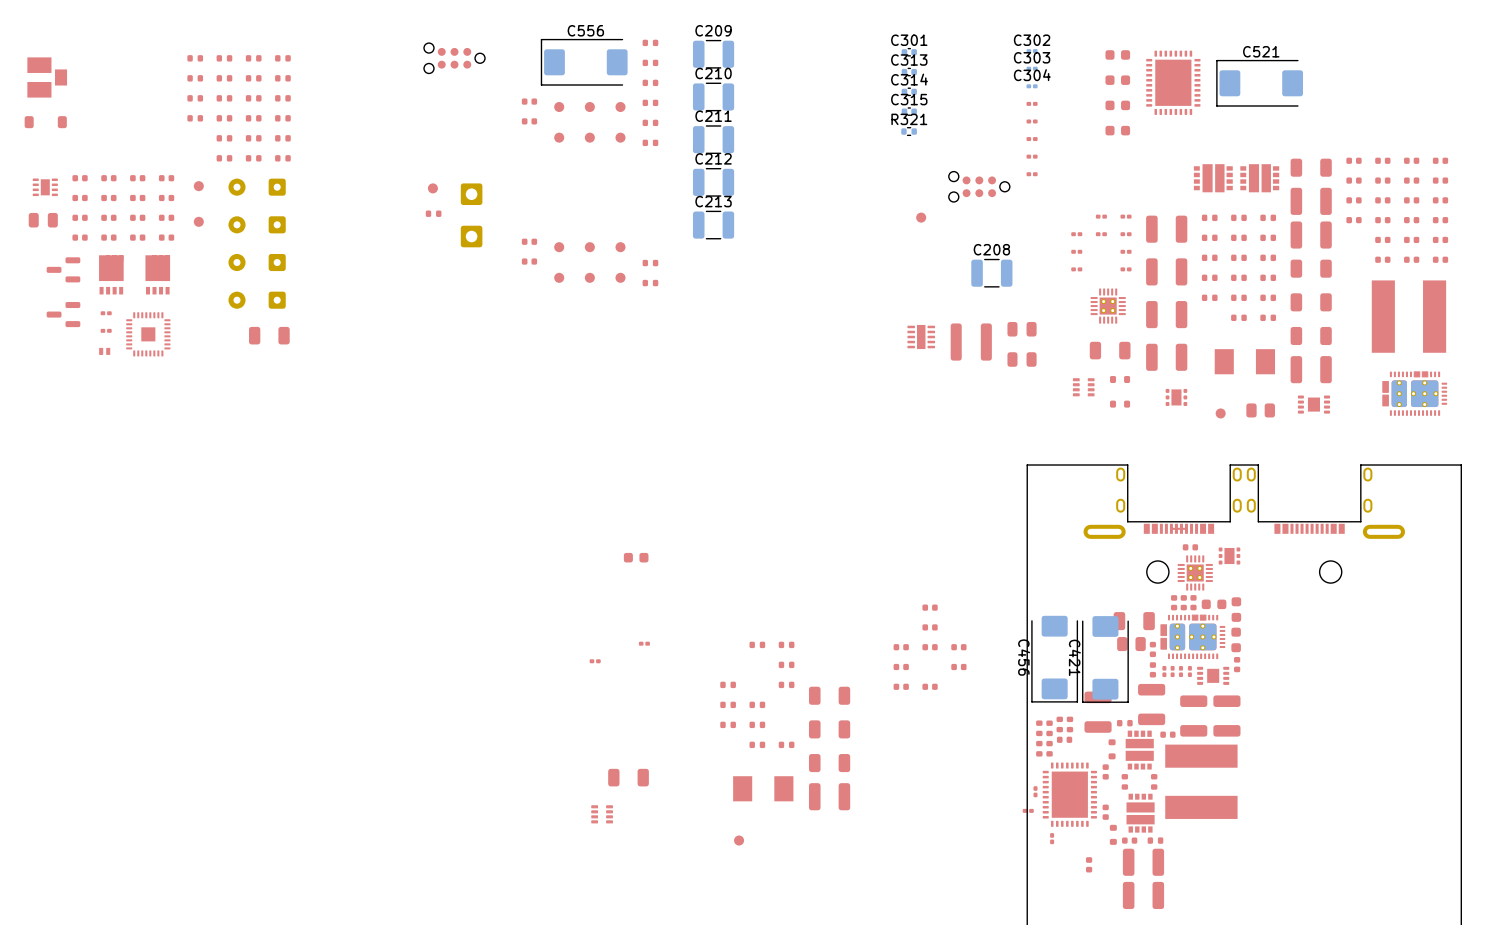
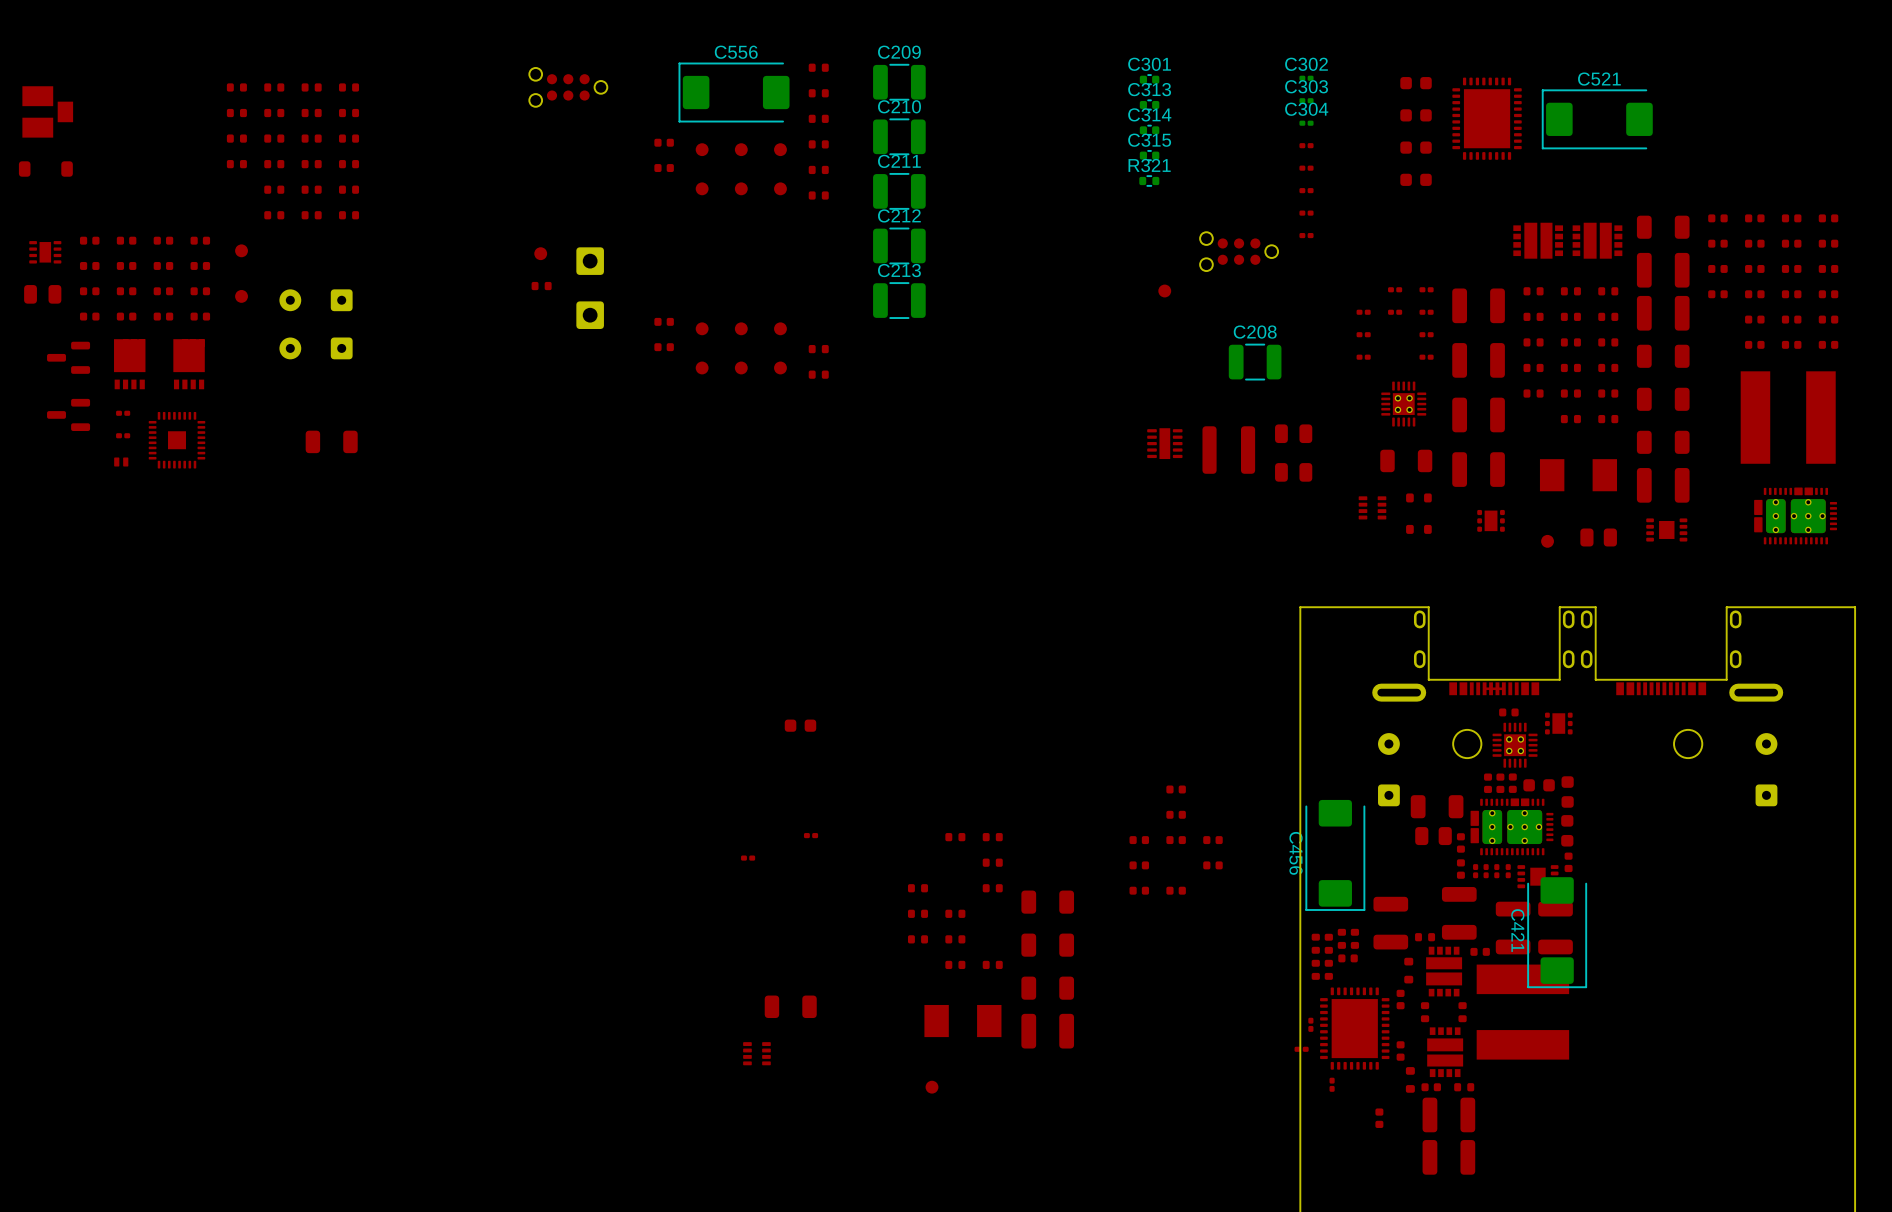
part: (257, 187) -> none
part: (257, 300) -> none
part: none -> (1388, 769)
part: none -> (1766, 769)
C421 position: (1105, 659) -> (1557, 932)

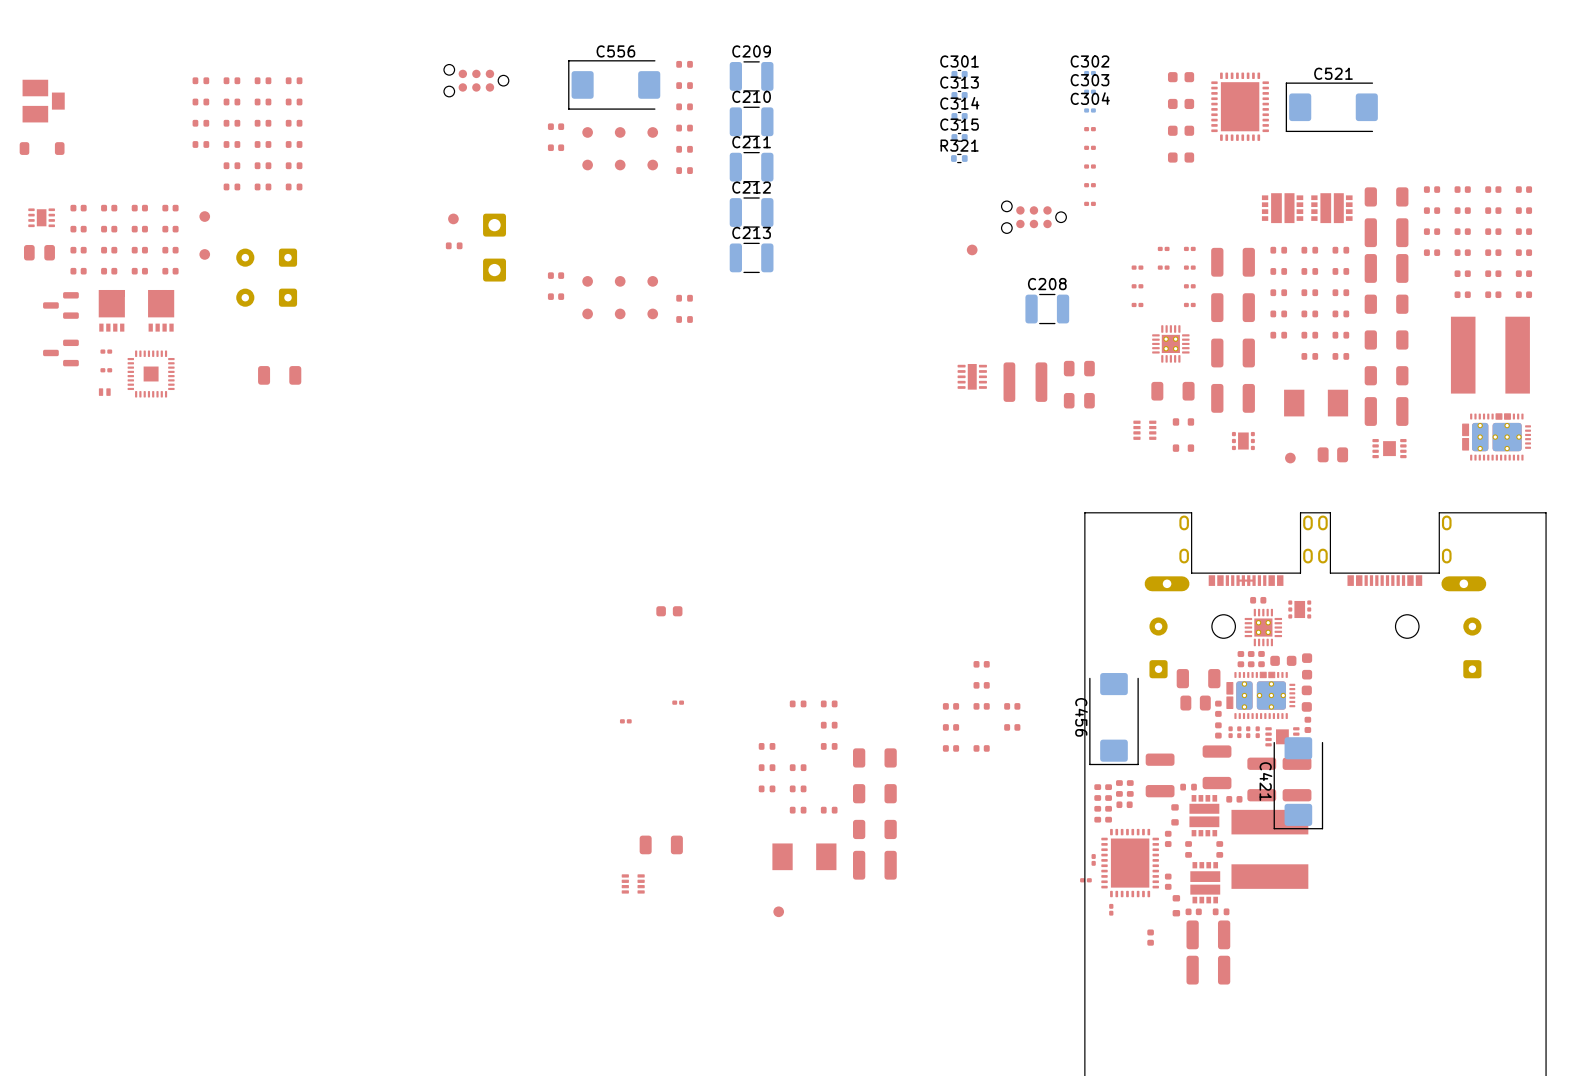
part footprint: [1372, 683, 1427, 702] -> [1144, 576, 1190, 592]
part footprint: [1729, 683, 1784, 702] -> [1441, 576, 1487, 592]

